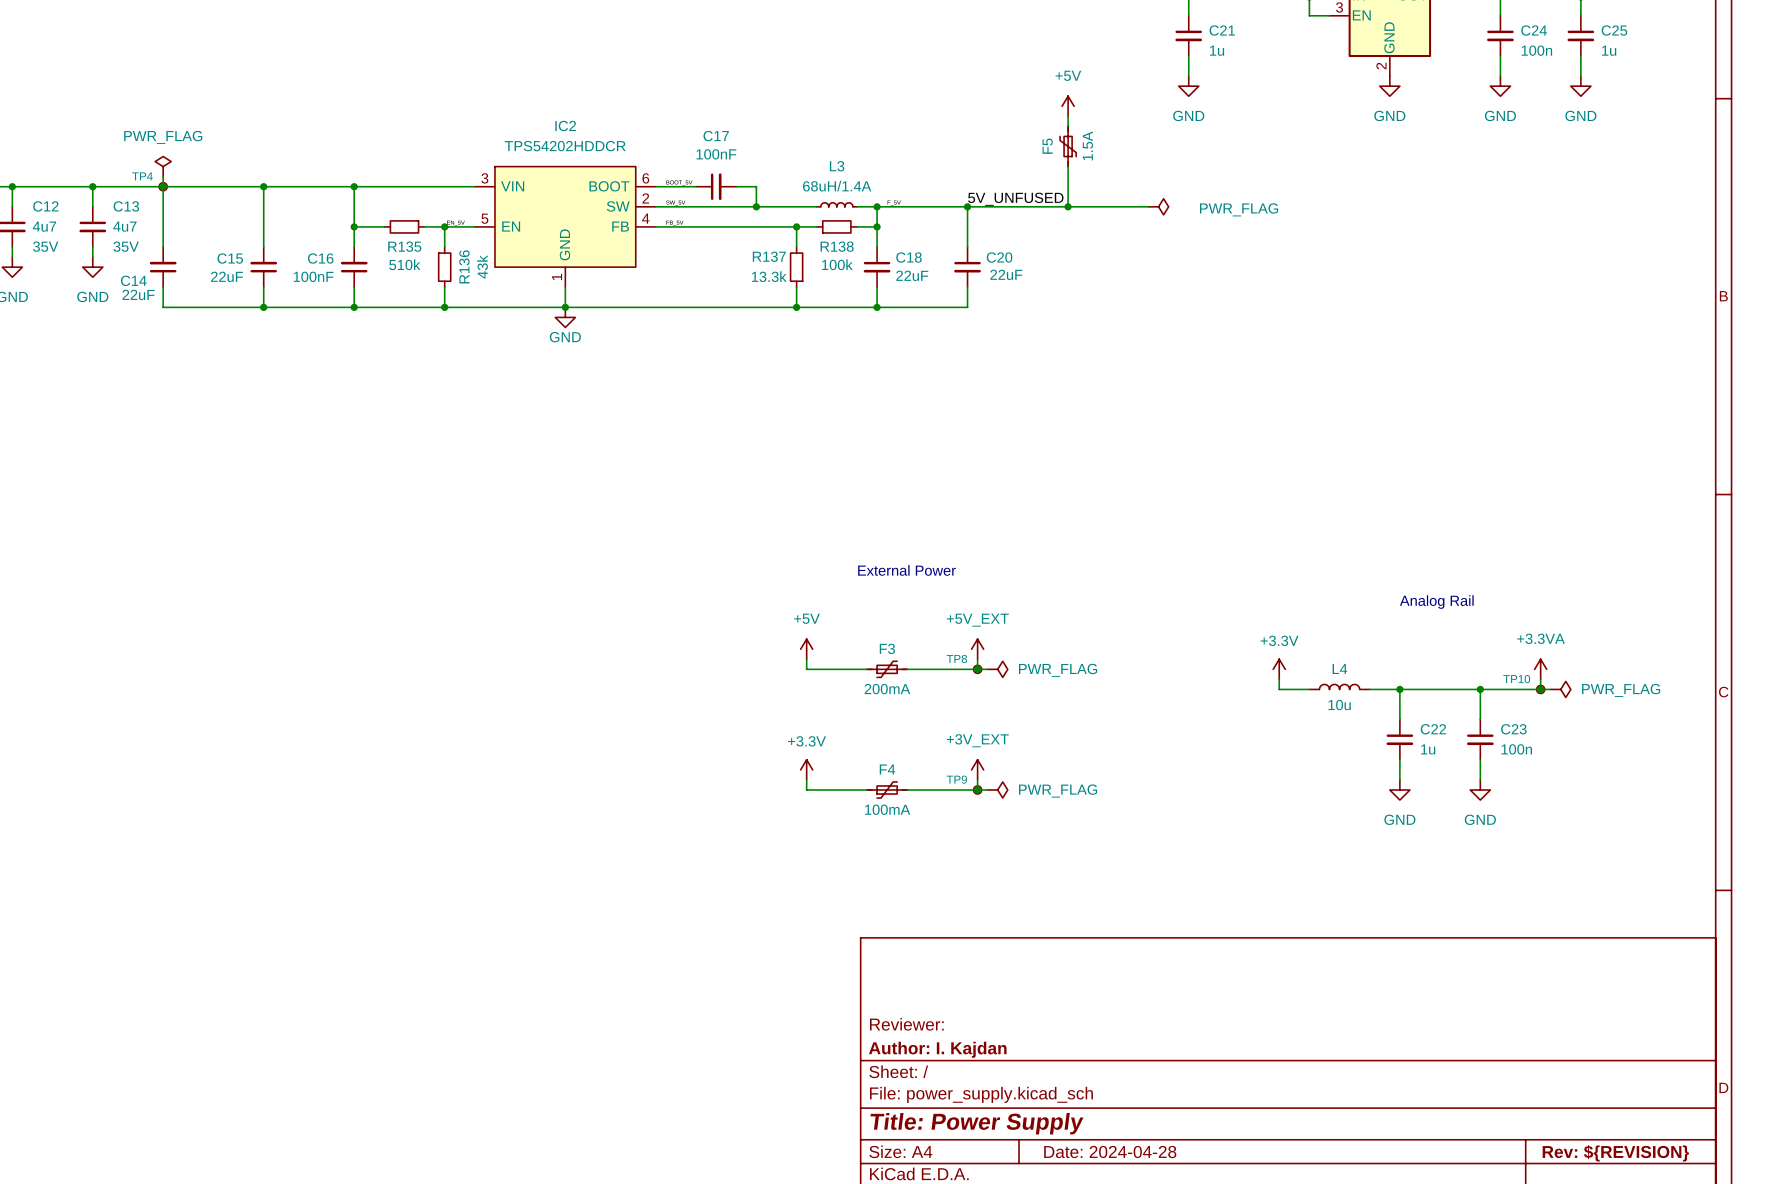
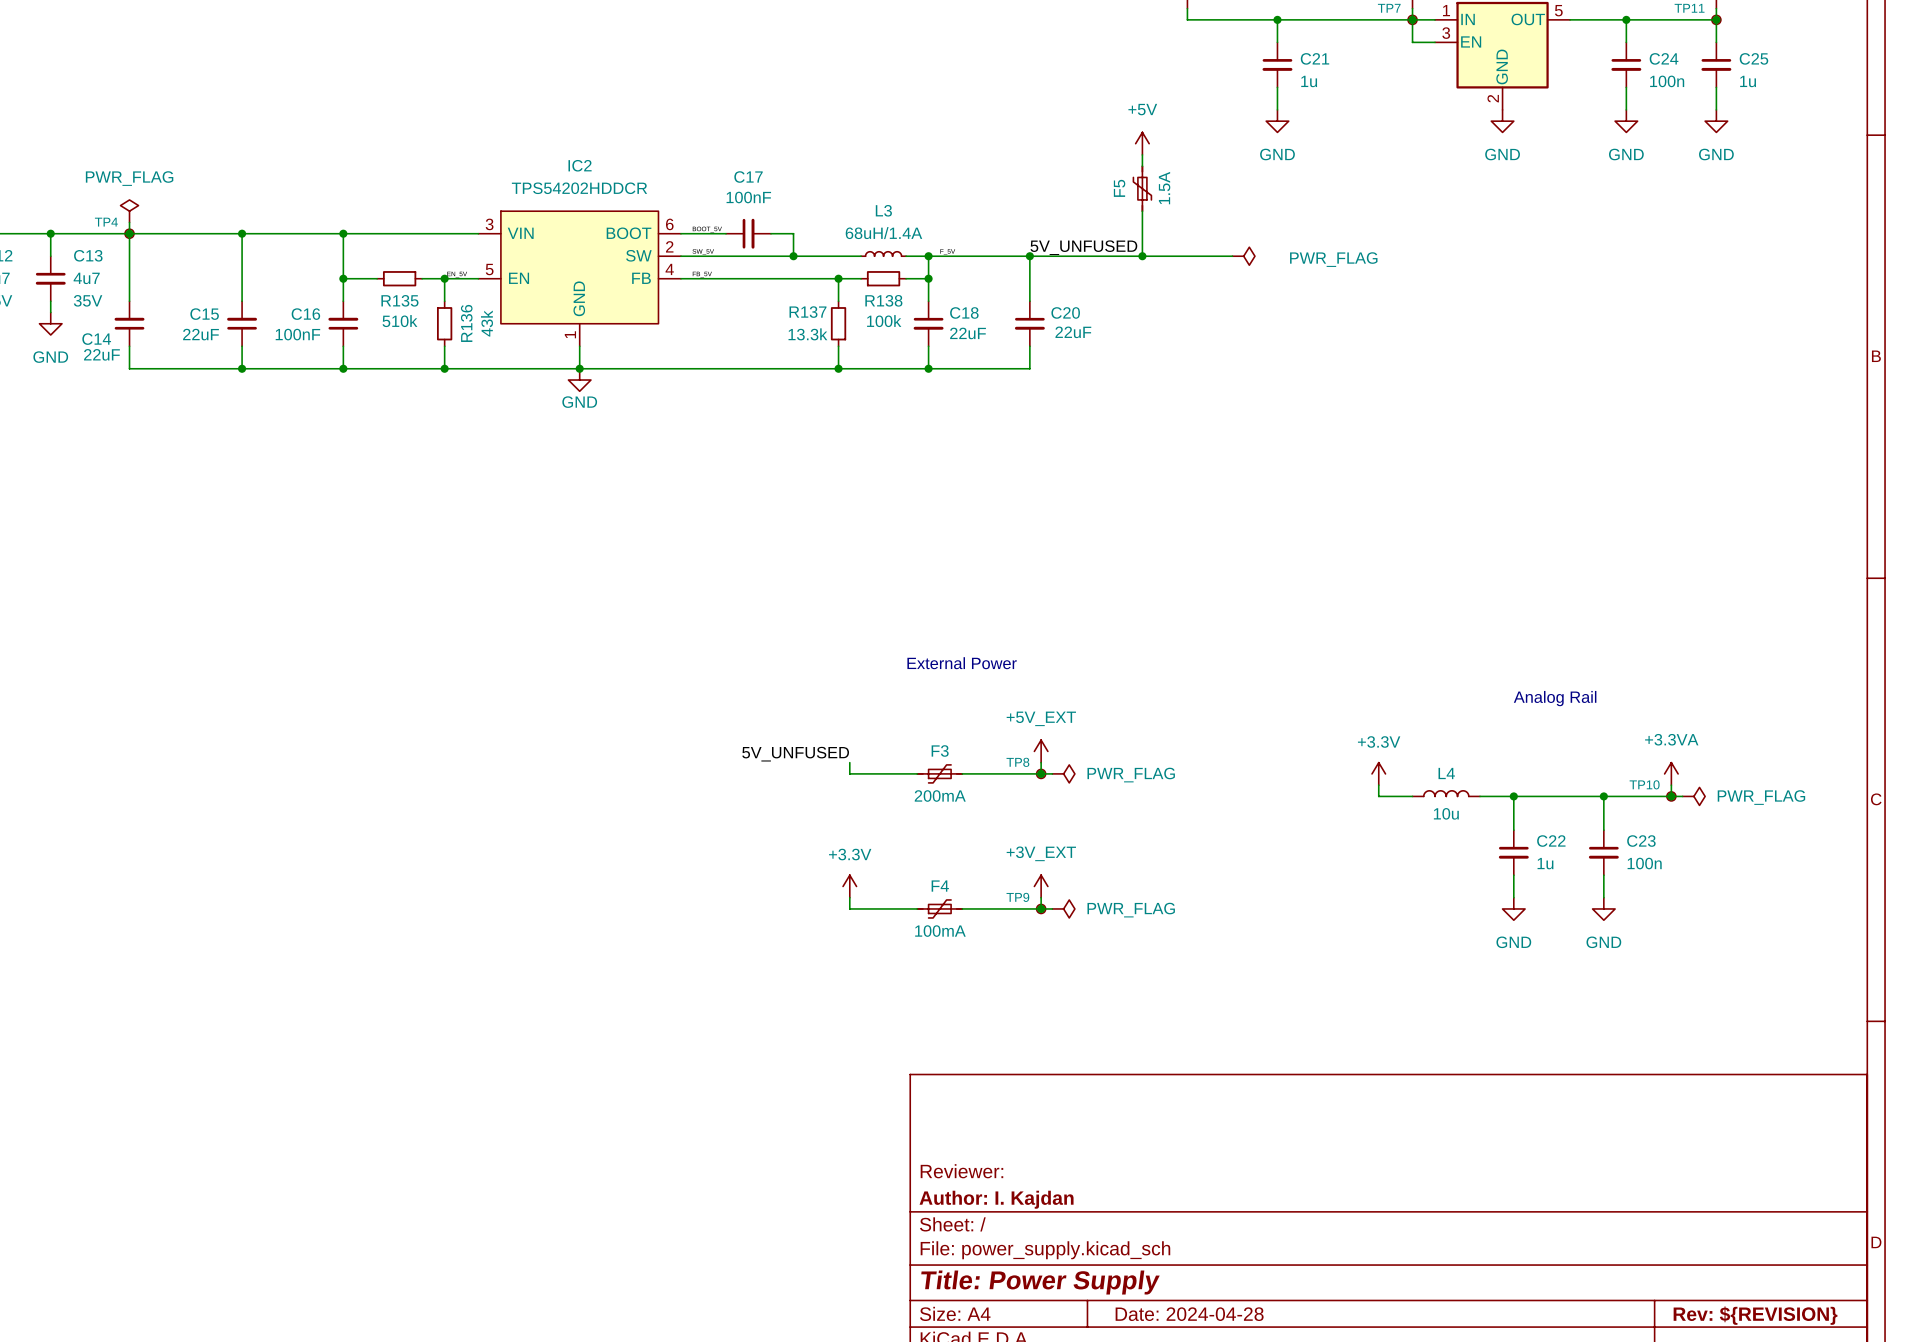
power symbol: +5V (806, 649) -> none
label: none -> 5V_UNFUSED (795, 754)

